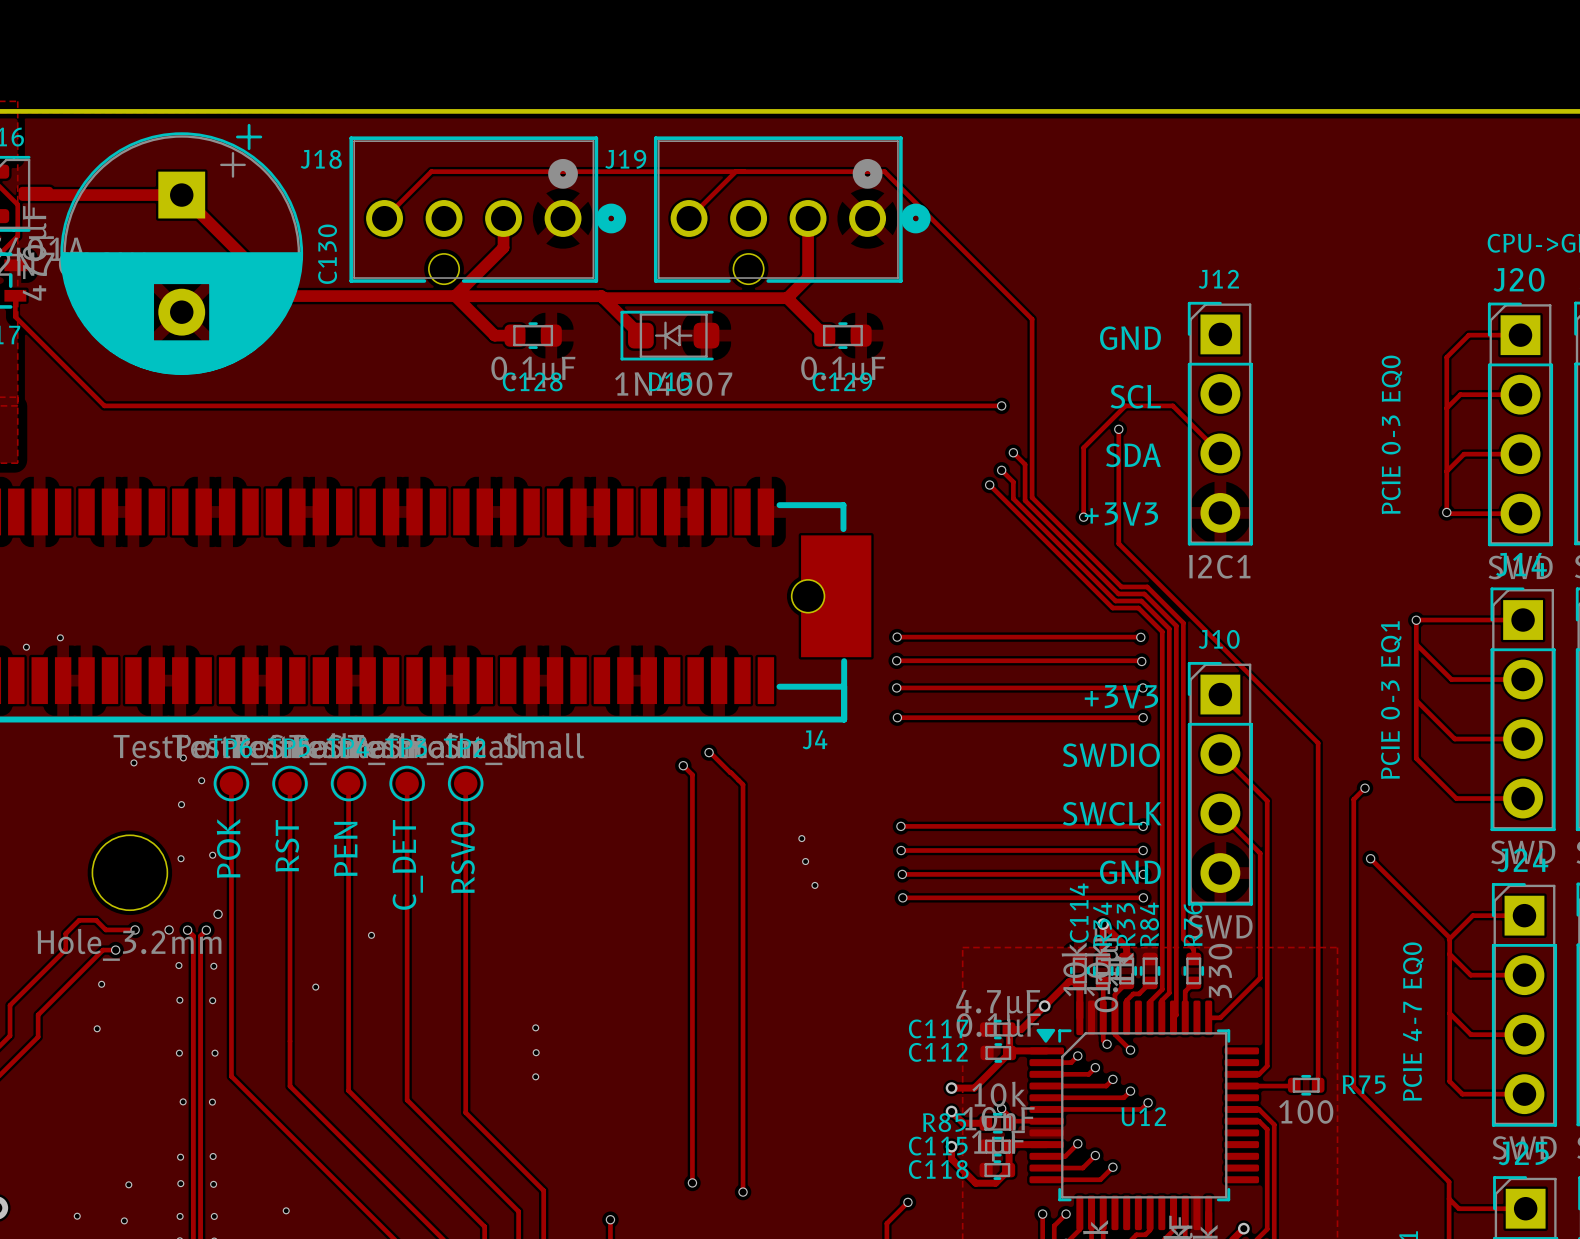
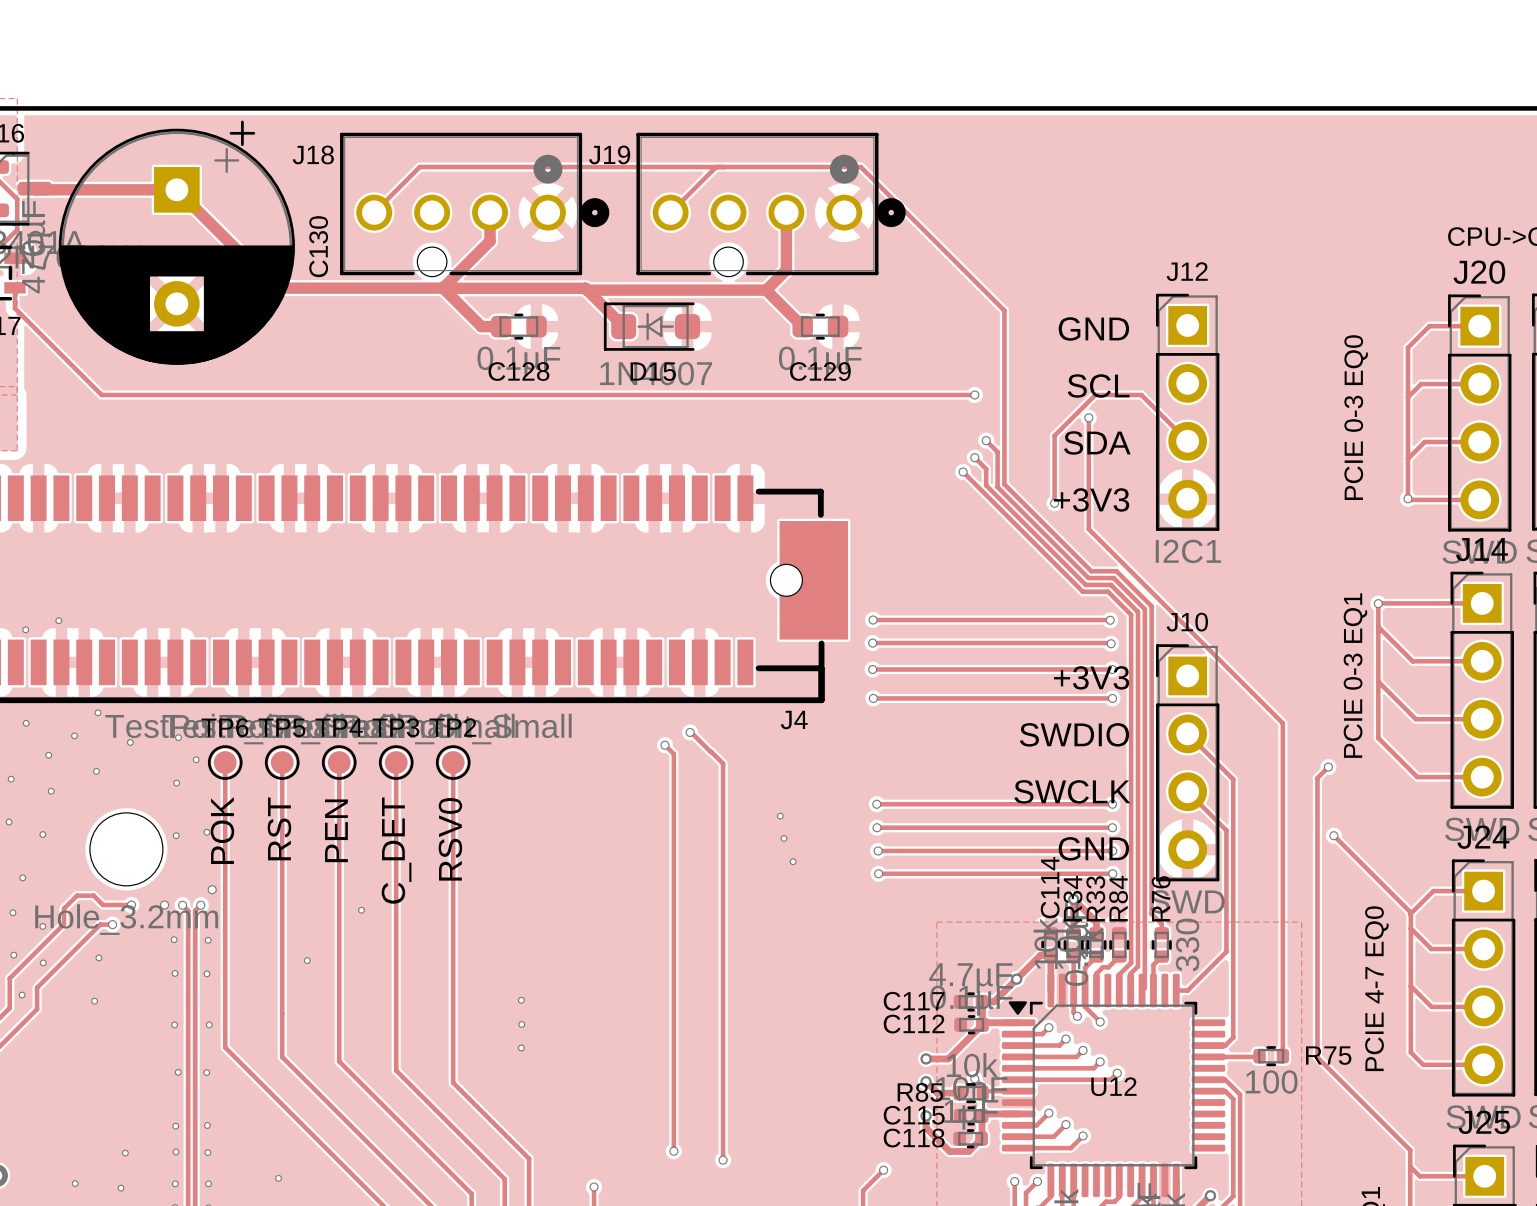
via: none -> (97, 712)
via: none -> (26, 723)
via: none -> (74, 735)
via: none -> (48, 755)
via: none -> (96, 771)
via: none -> (11, 779)
via: none -> (51, 791)
via: none -> (9, 822)
via: none -> (42, 834)
via: none -> (22, 877)
via: none -> (12, 912)
via: none -> (42, 926)
via: none -> (13, 955)
via: none -> (43, 962)
via: none -> (22, 995)

